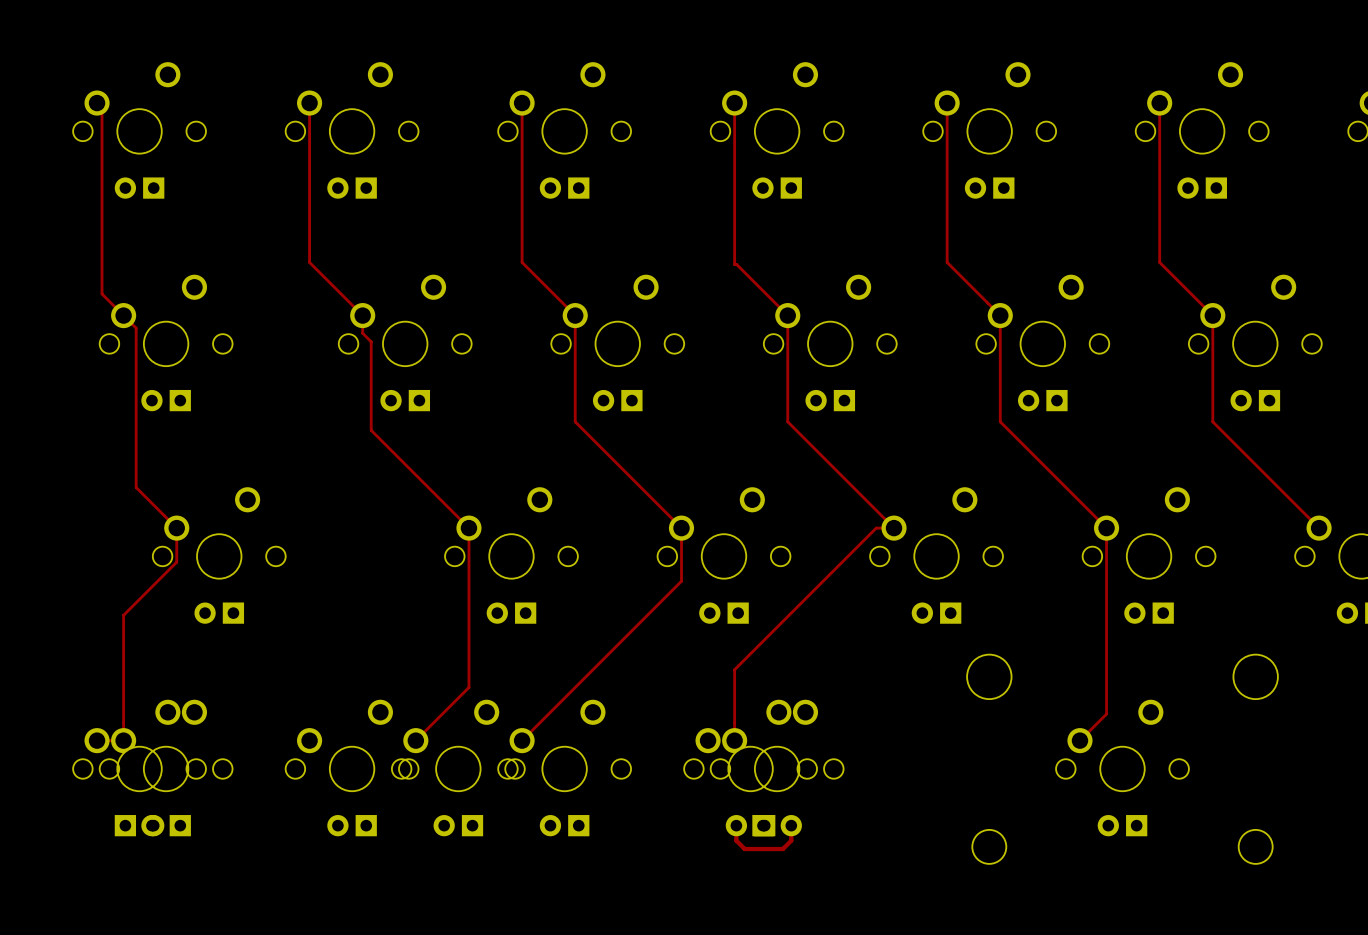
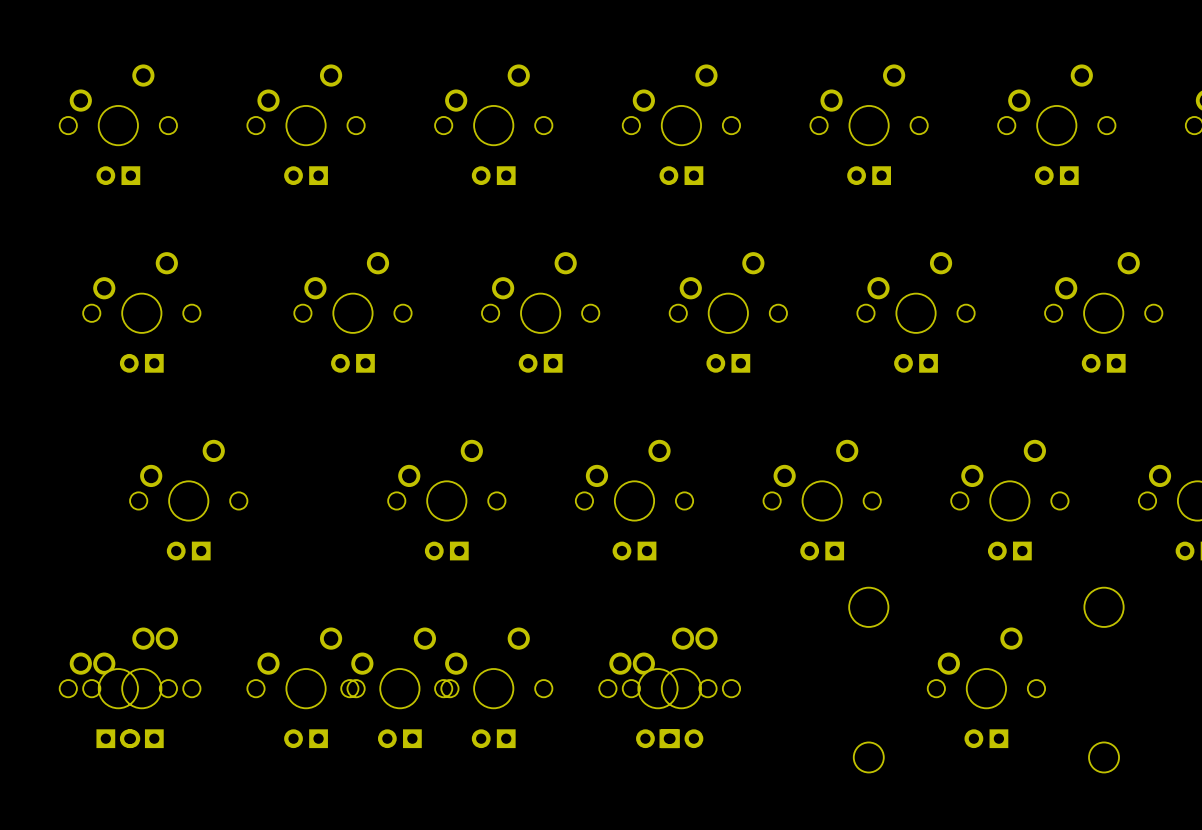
track: (97, 103) (102, 108) (102, 293) (136, 328) (136, 487) (176, 528) (176, 562) (123, 615) (123, 740) (97, 740) -> none
track: (309, 103) (309, 262) (362, 315) (362, 333) (371, 341) (371, 430) (468, 528) (468, 687) (415, 740) -> none
track: (522, 103) (522, 262) (575, 315) (575, 421) (681, 528) (681, 581) (522, 740) -> none
track: (734, 103) (734, 264) (787, 315) (787, 421) (894, 528) (876, 528) (734, 669) (734, 740) -> none
track: (947, 103) (947, 262) (1000, 315) (1000, 421) (1106, 528) (1106, 714) (1079, 740) -> none
track: (1159, 103) (1159, 262) (1212, 315) (1212, 421) (1319, 528) -> none
track: (736, 825) (736, 840) (744, 849) (782, 849) (791, 840) (791, 825) -> none

